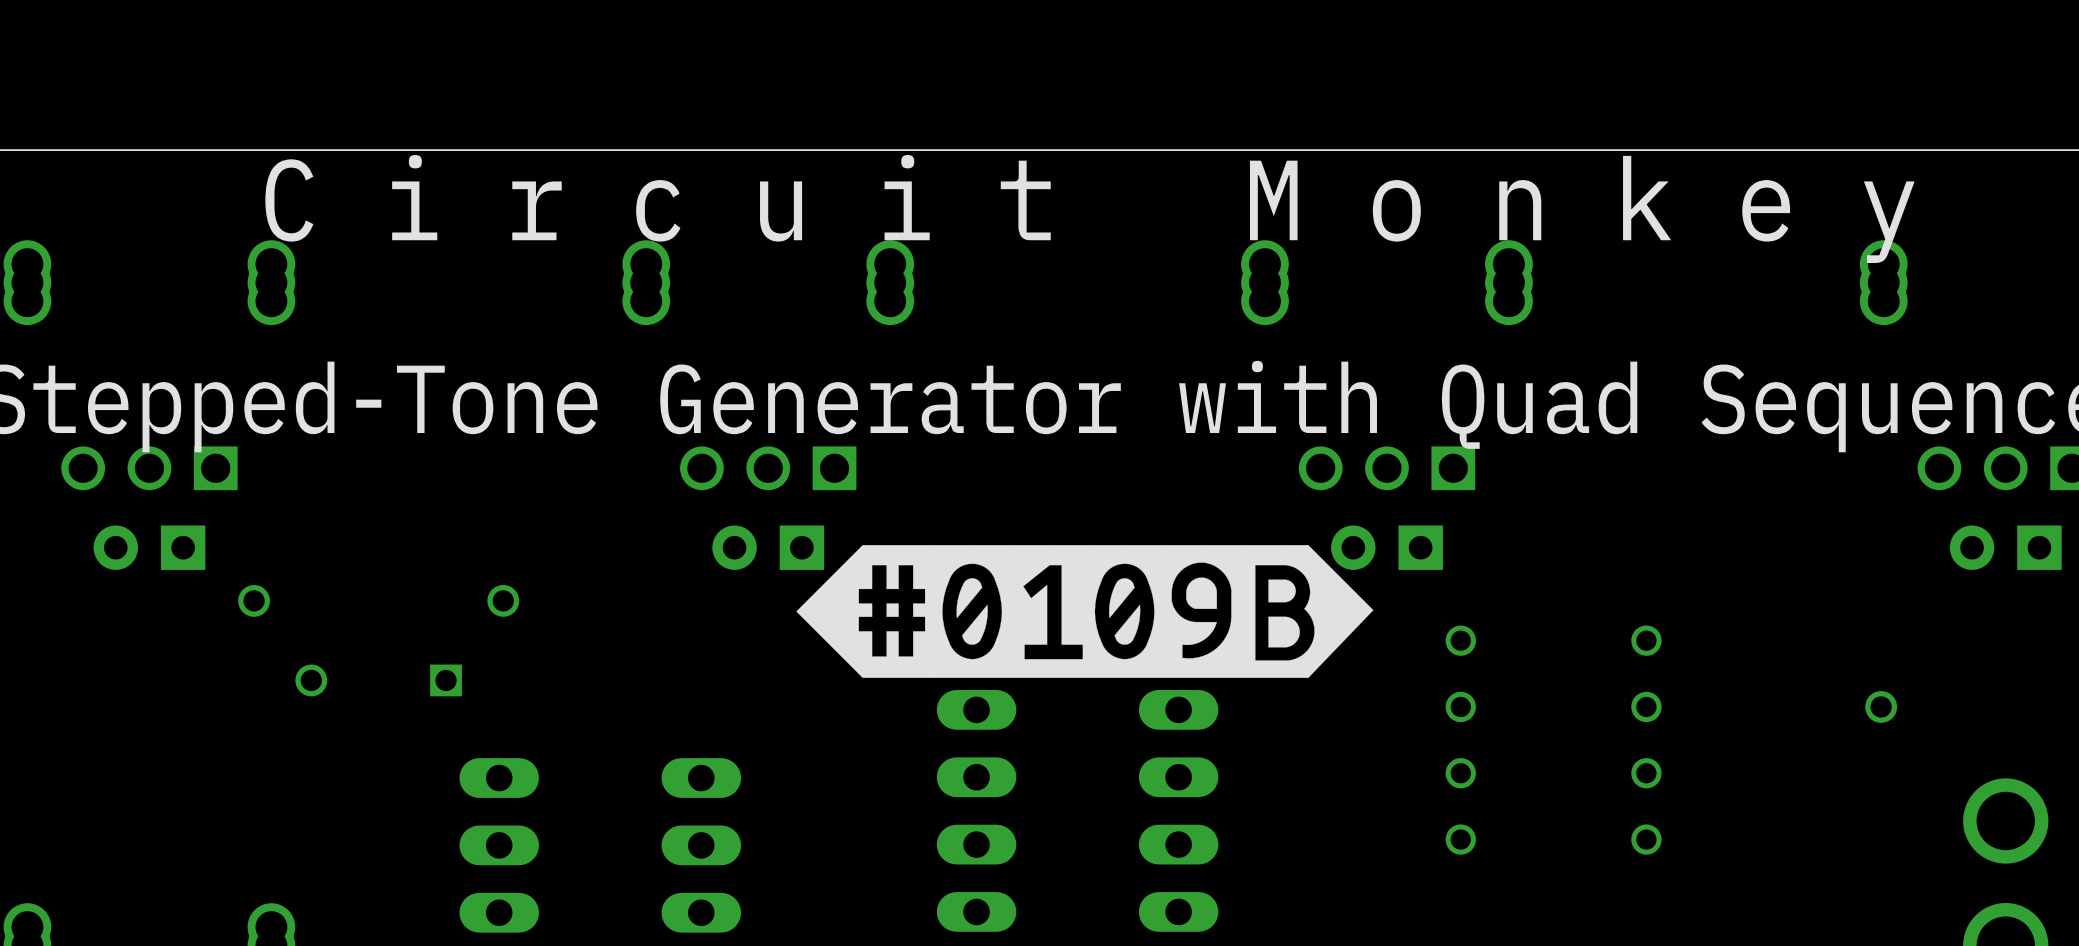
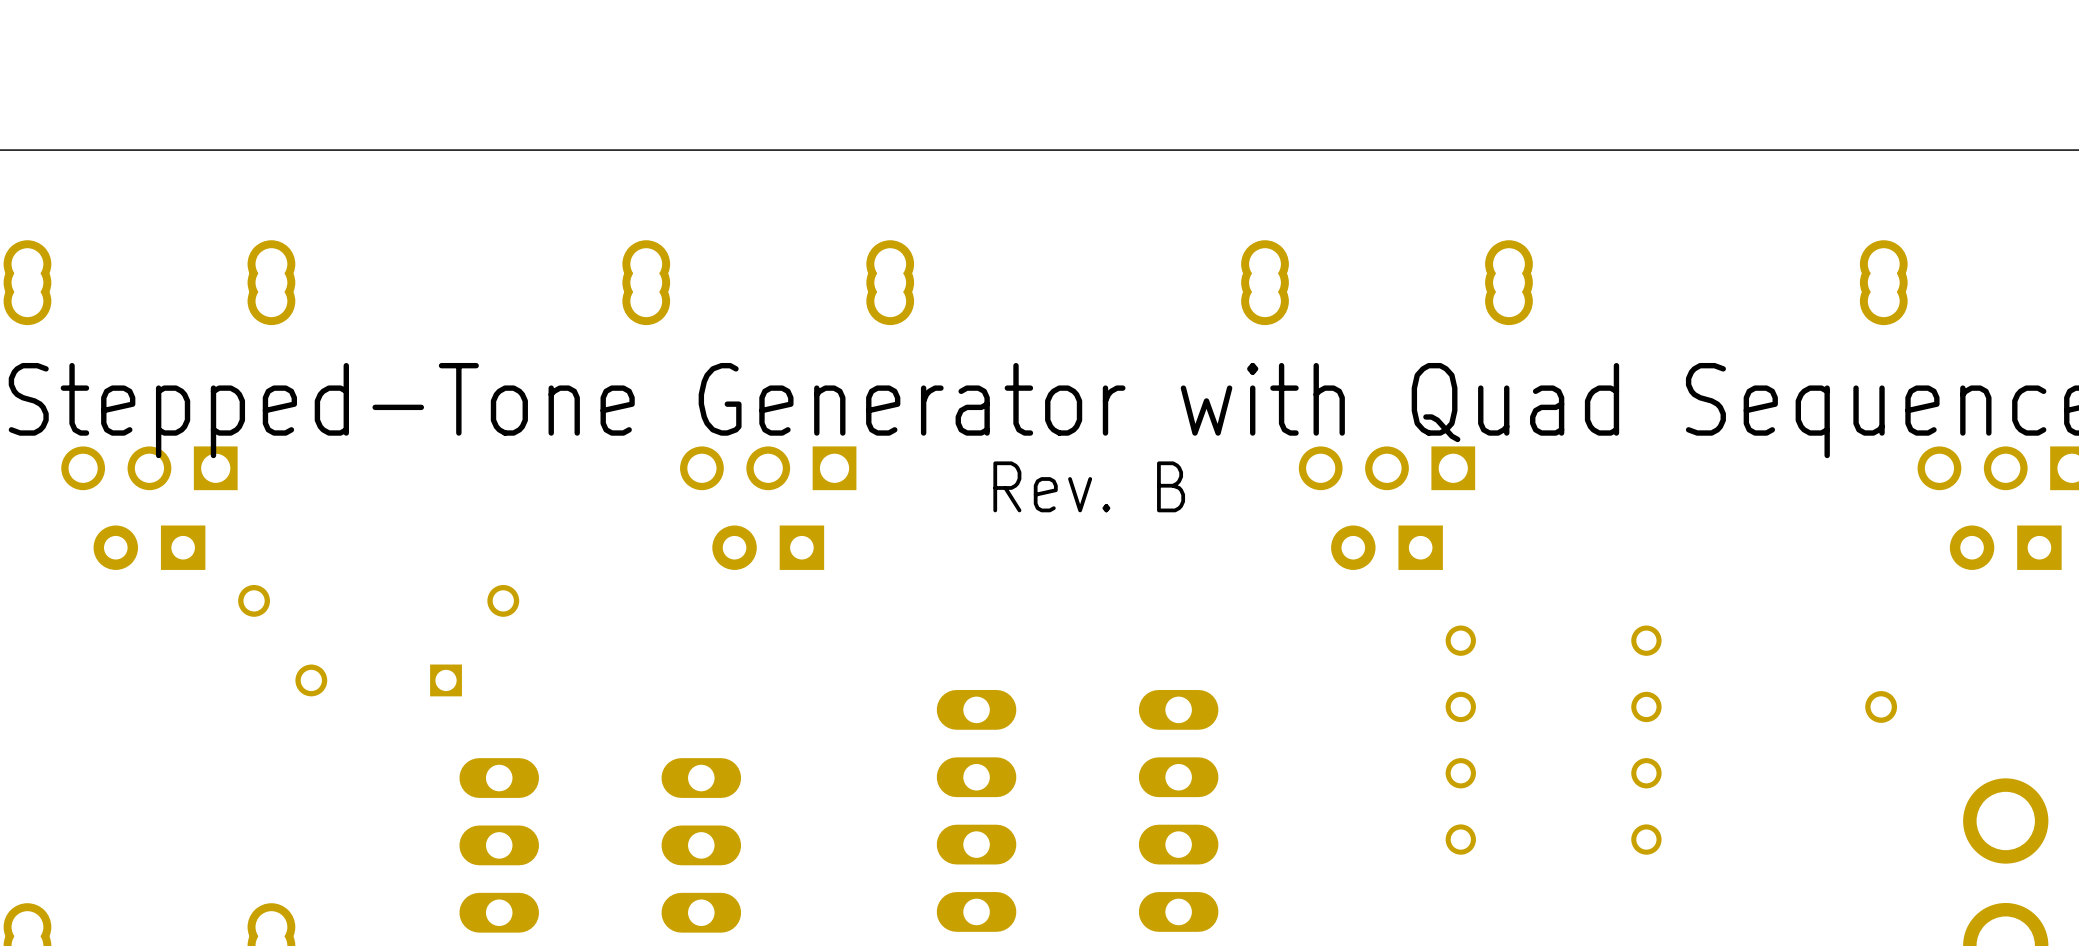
text: C i r c u i t M o n k e y (1089, 209) -> none
text: none -> Rev. B (1089, 486)
drawing: [796, 545, 1374, 678] -> none

